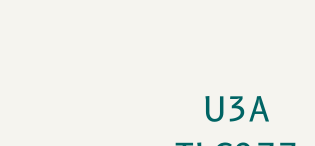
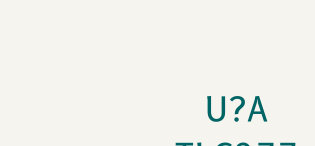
U3A name: U3A (237, 108) -> U?A (237, 108)

